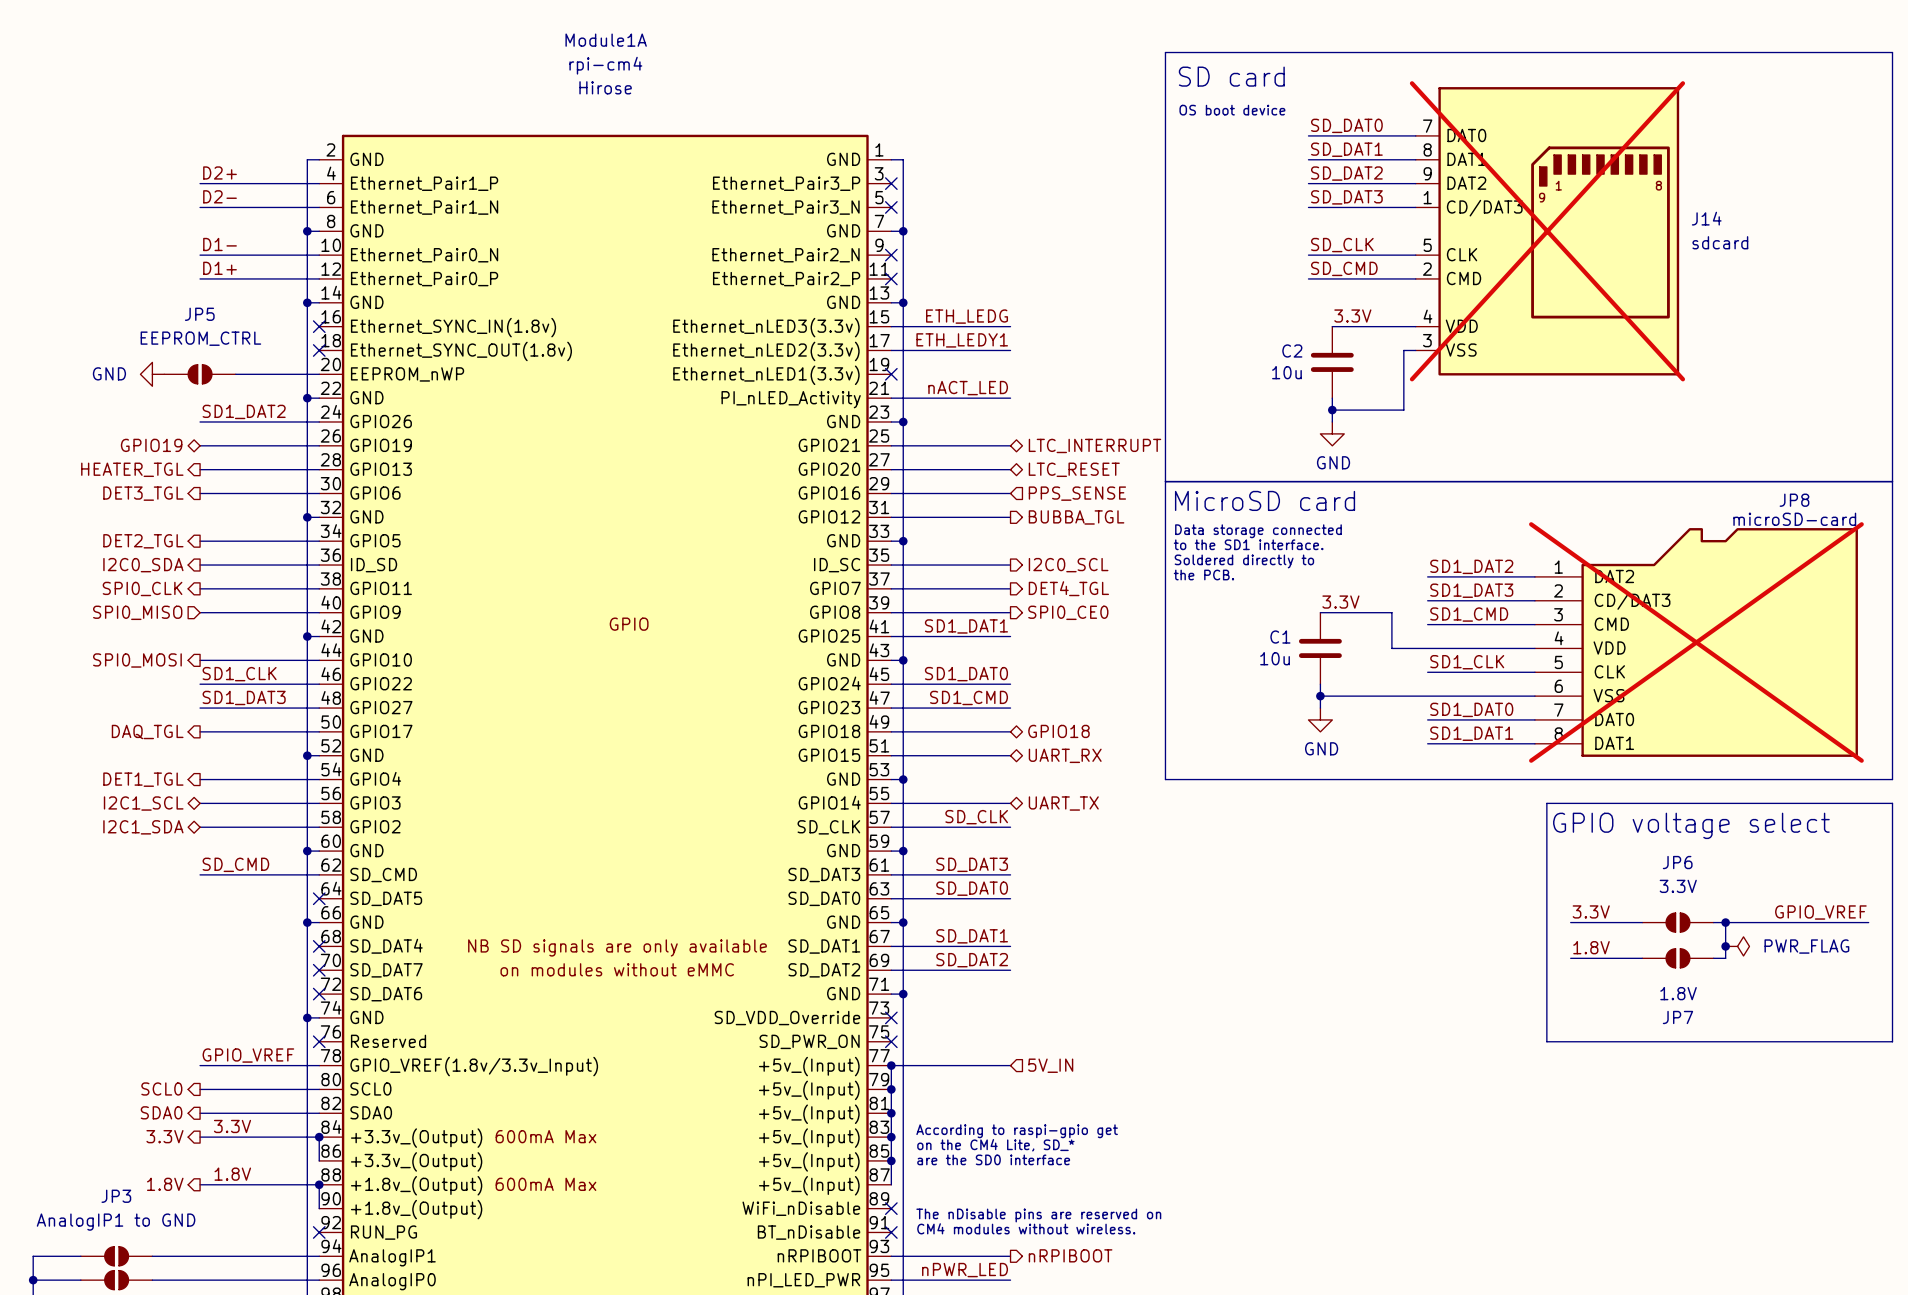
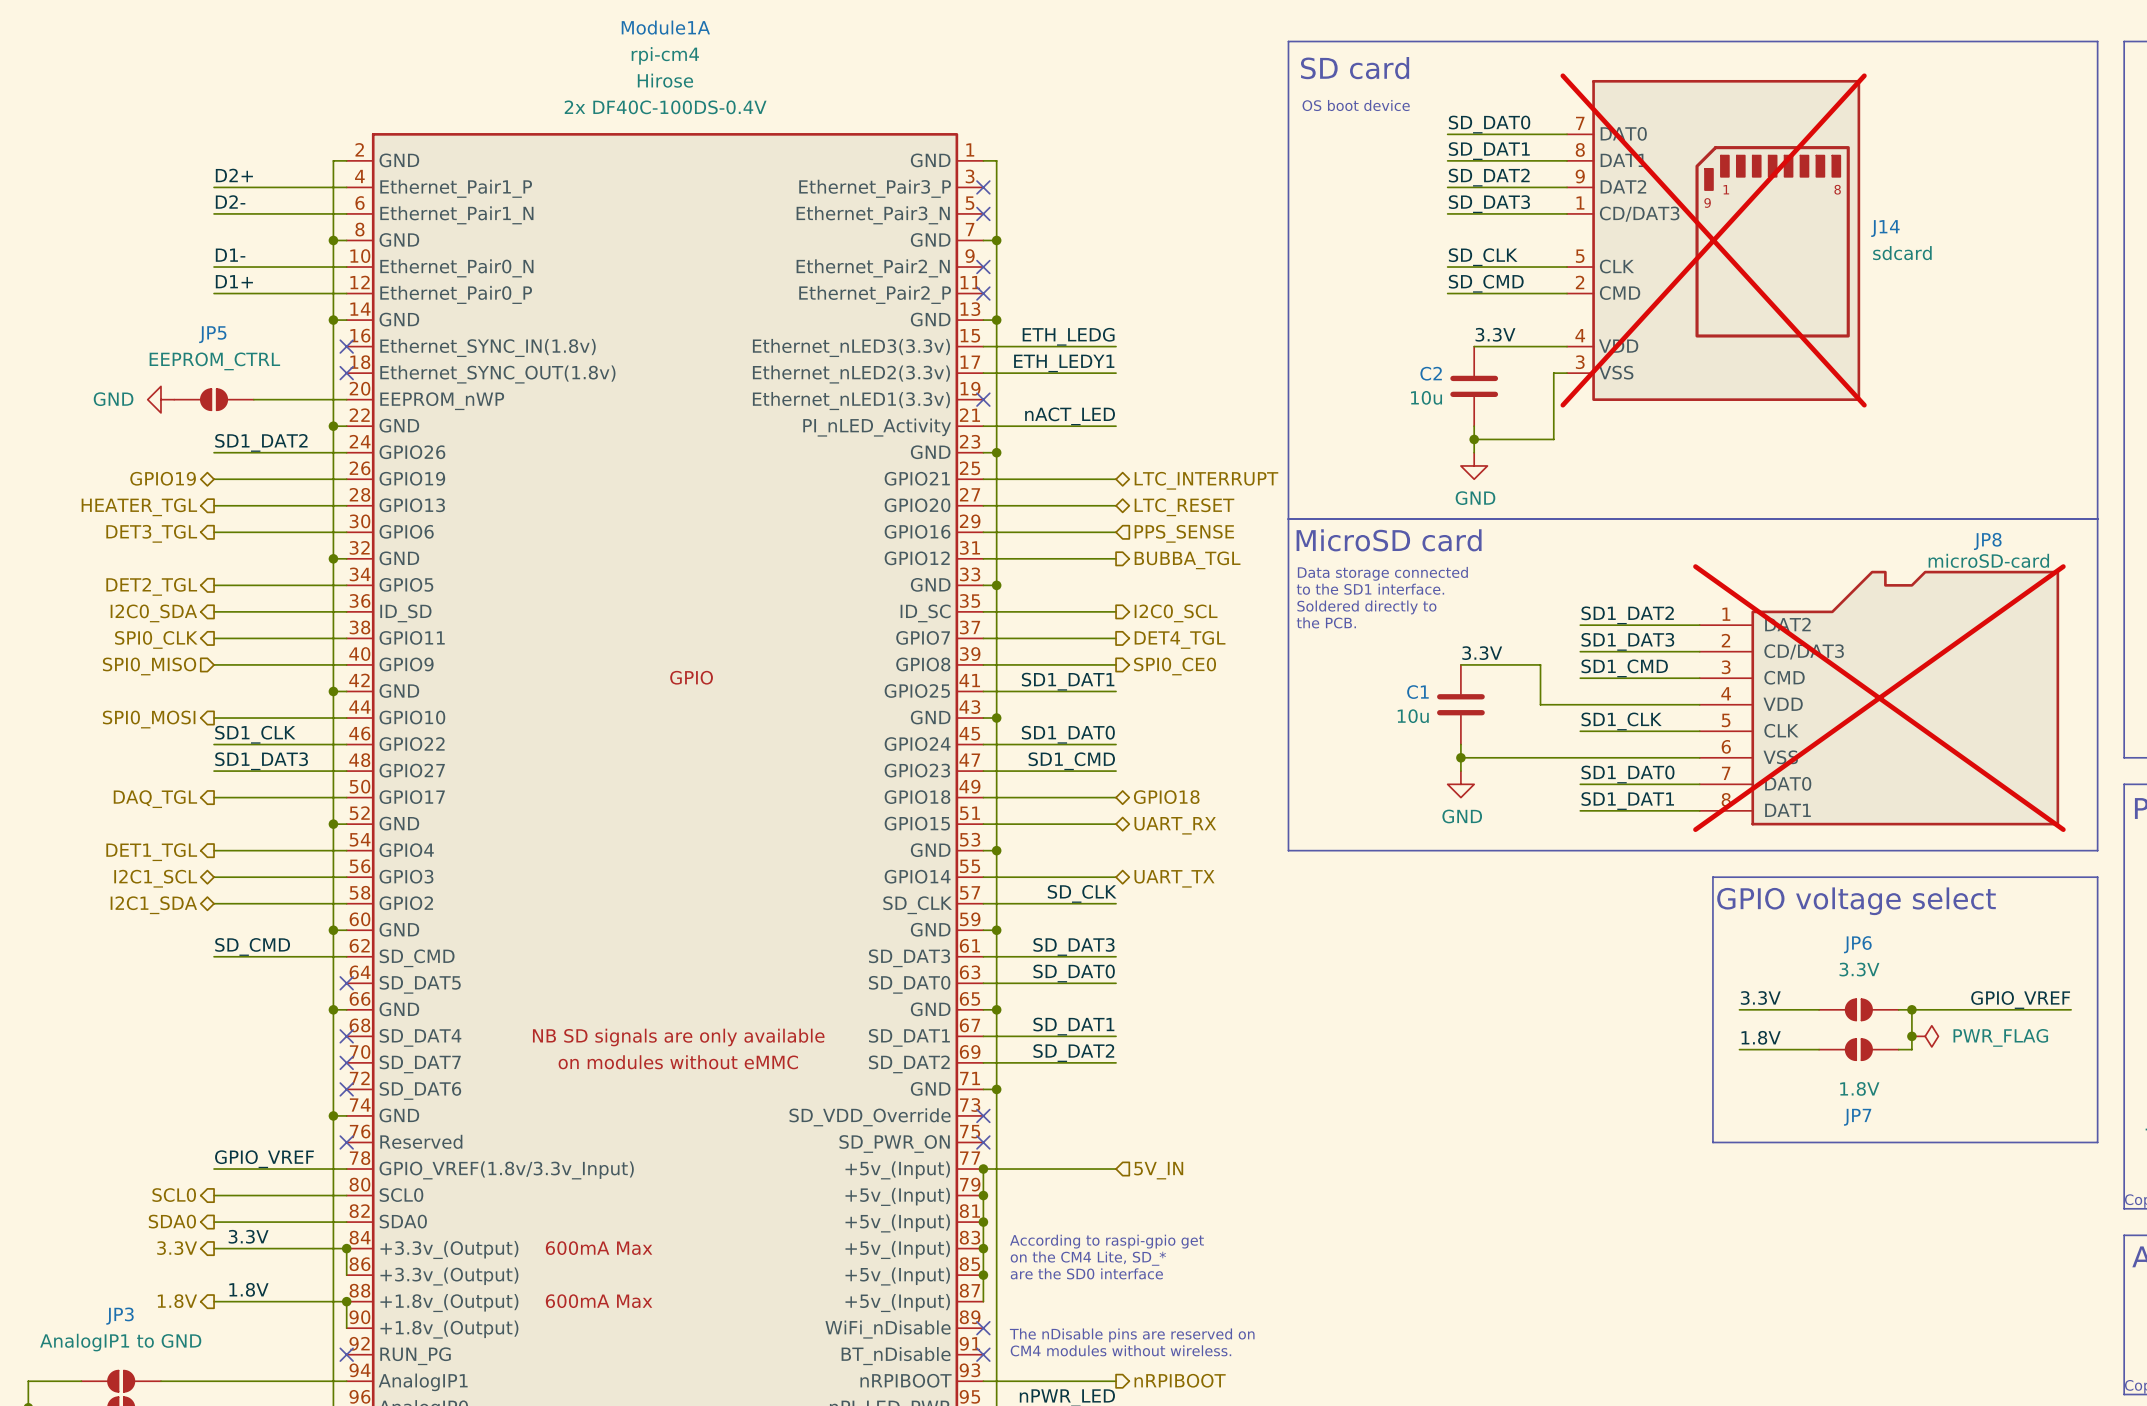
Module1A text: none -> 2x DF40C-100DS-0.4V (665, 107)

